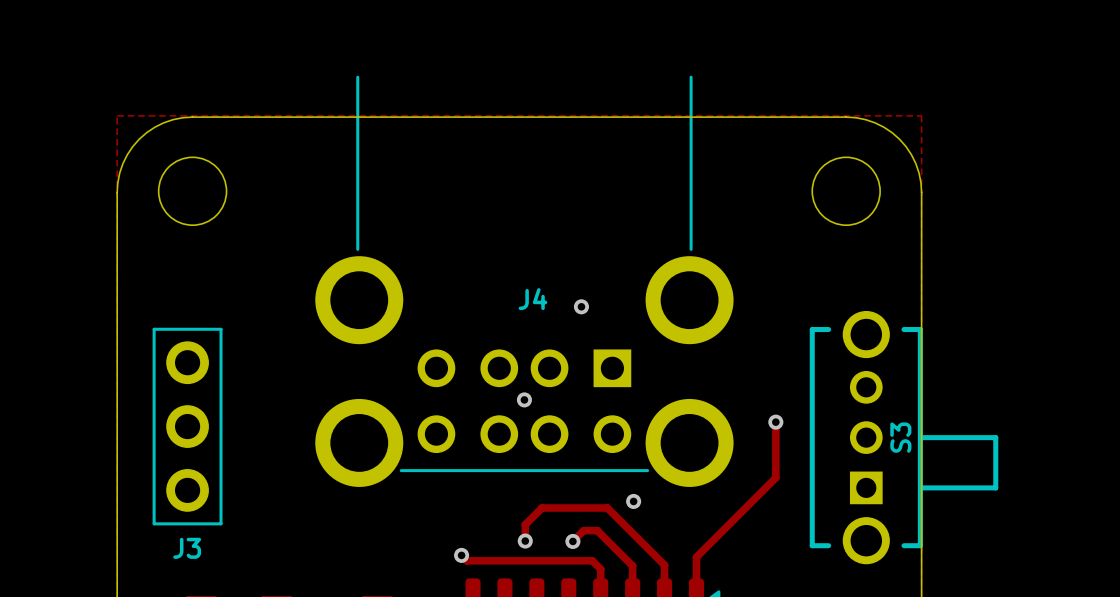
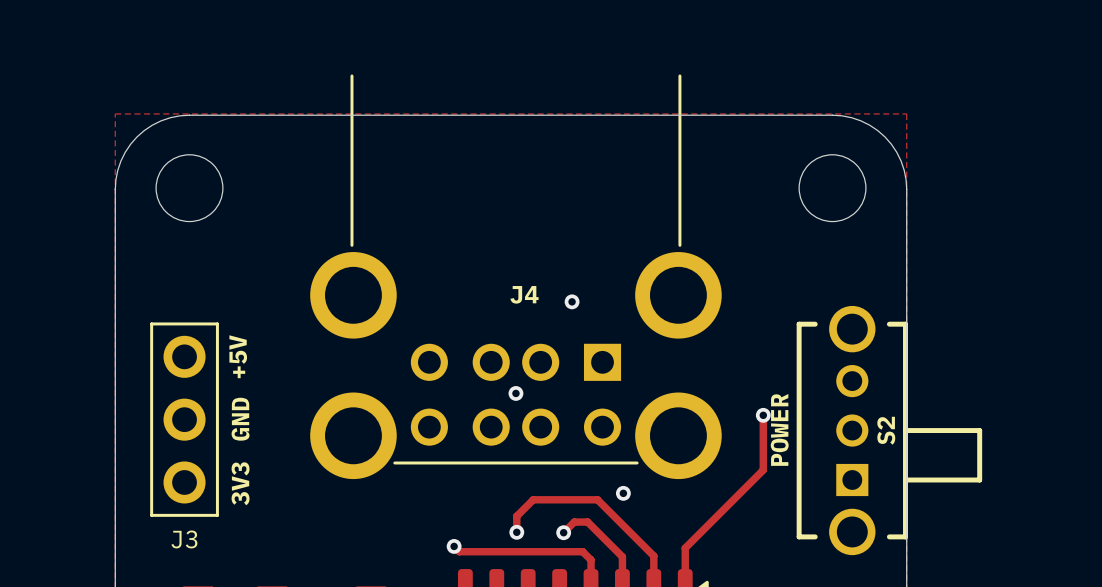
text: none -> +5V (238, 356)
text: none -> GND (240, 419)
text: none -> POWER (779, 429)
S3 name: S3 (900, 437) -> S2 (886, 430)
text: none -> 3V3 (240, 483)

